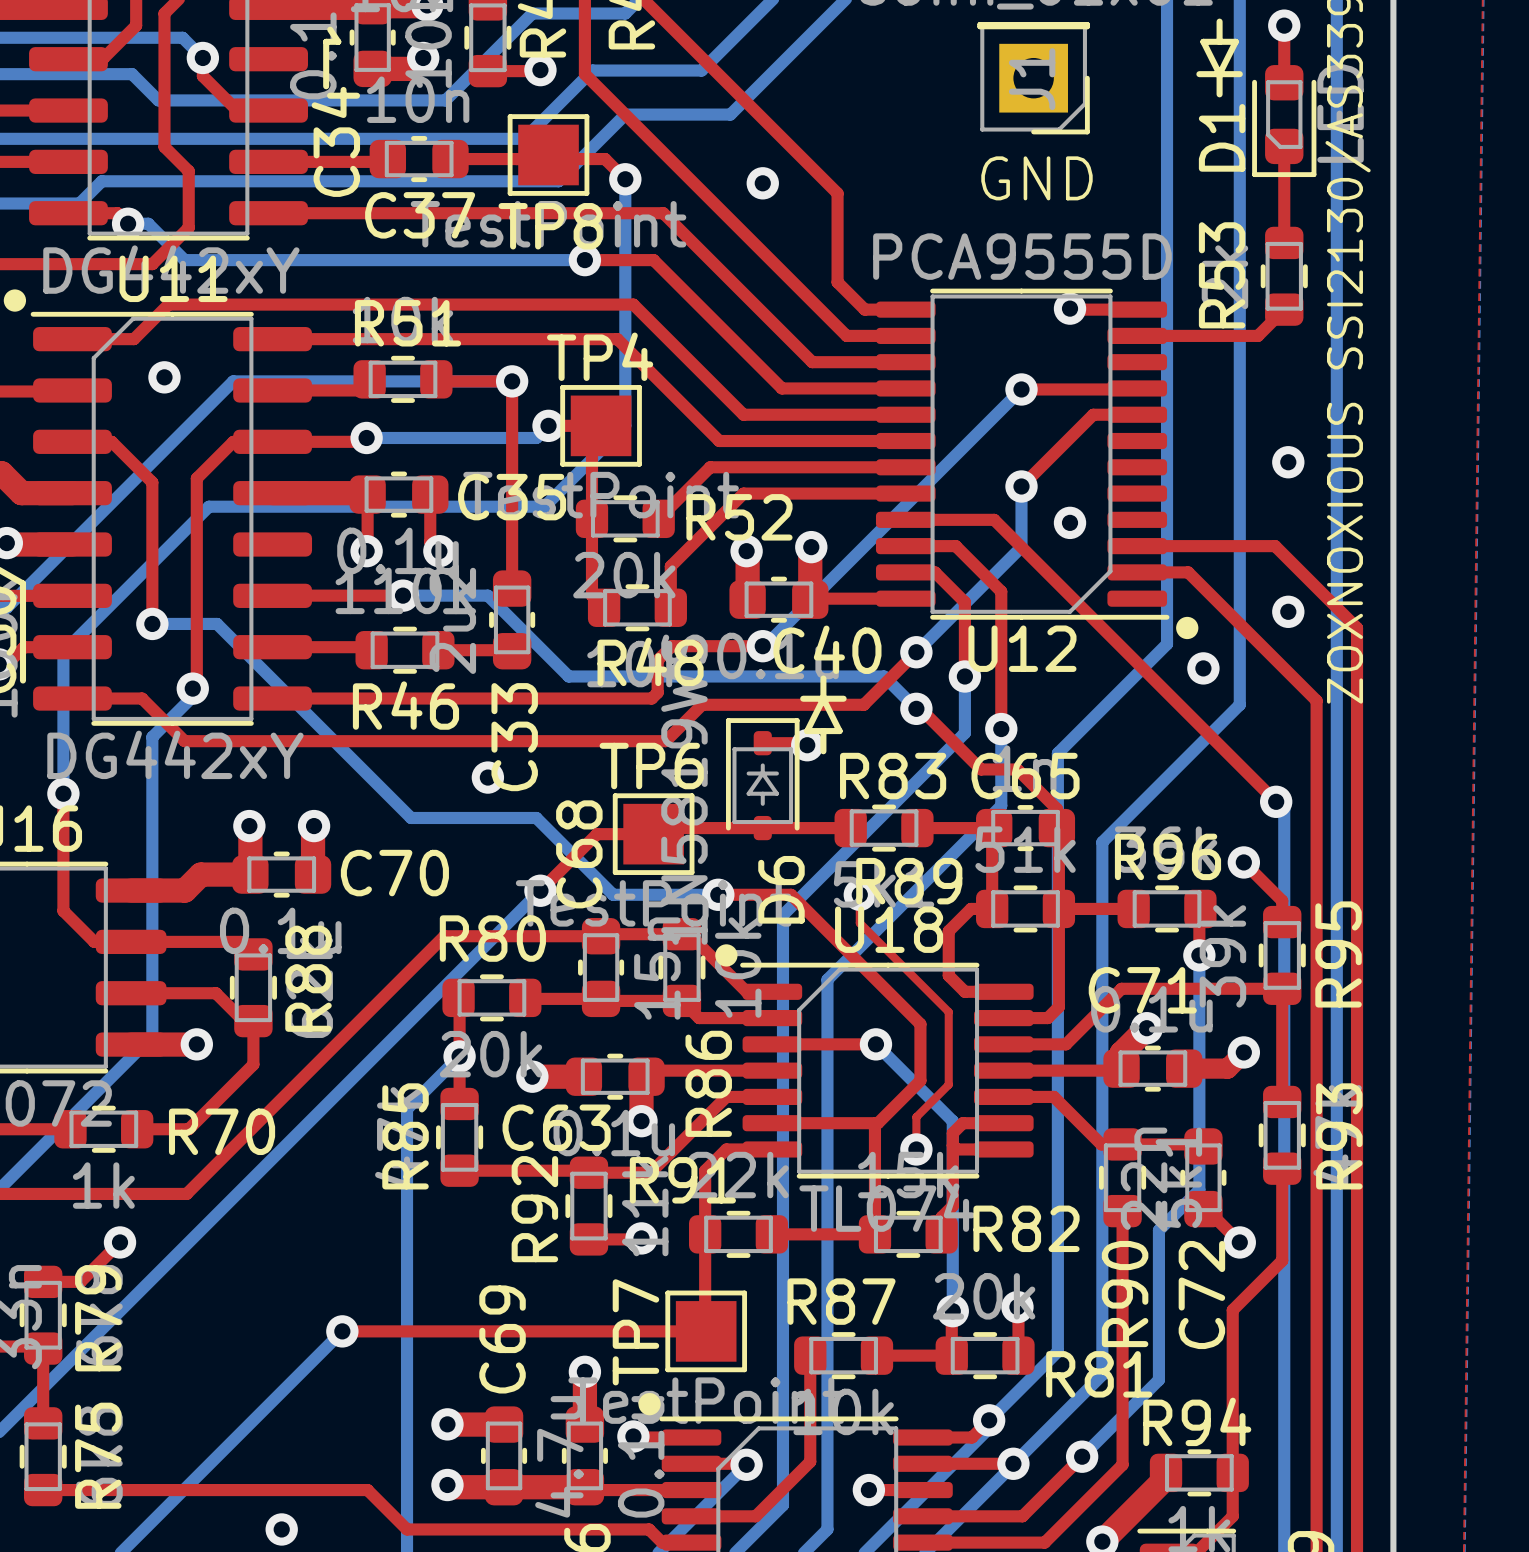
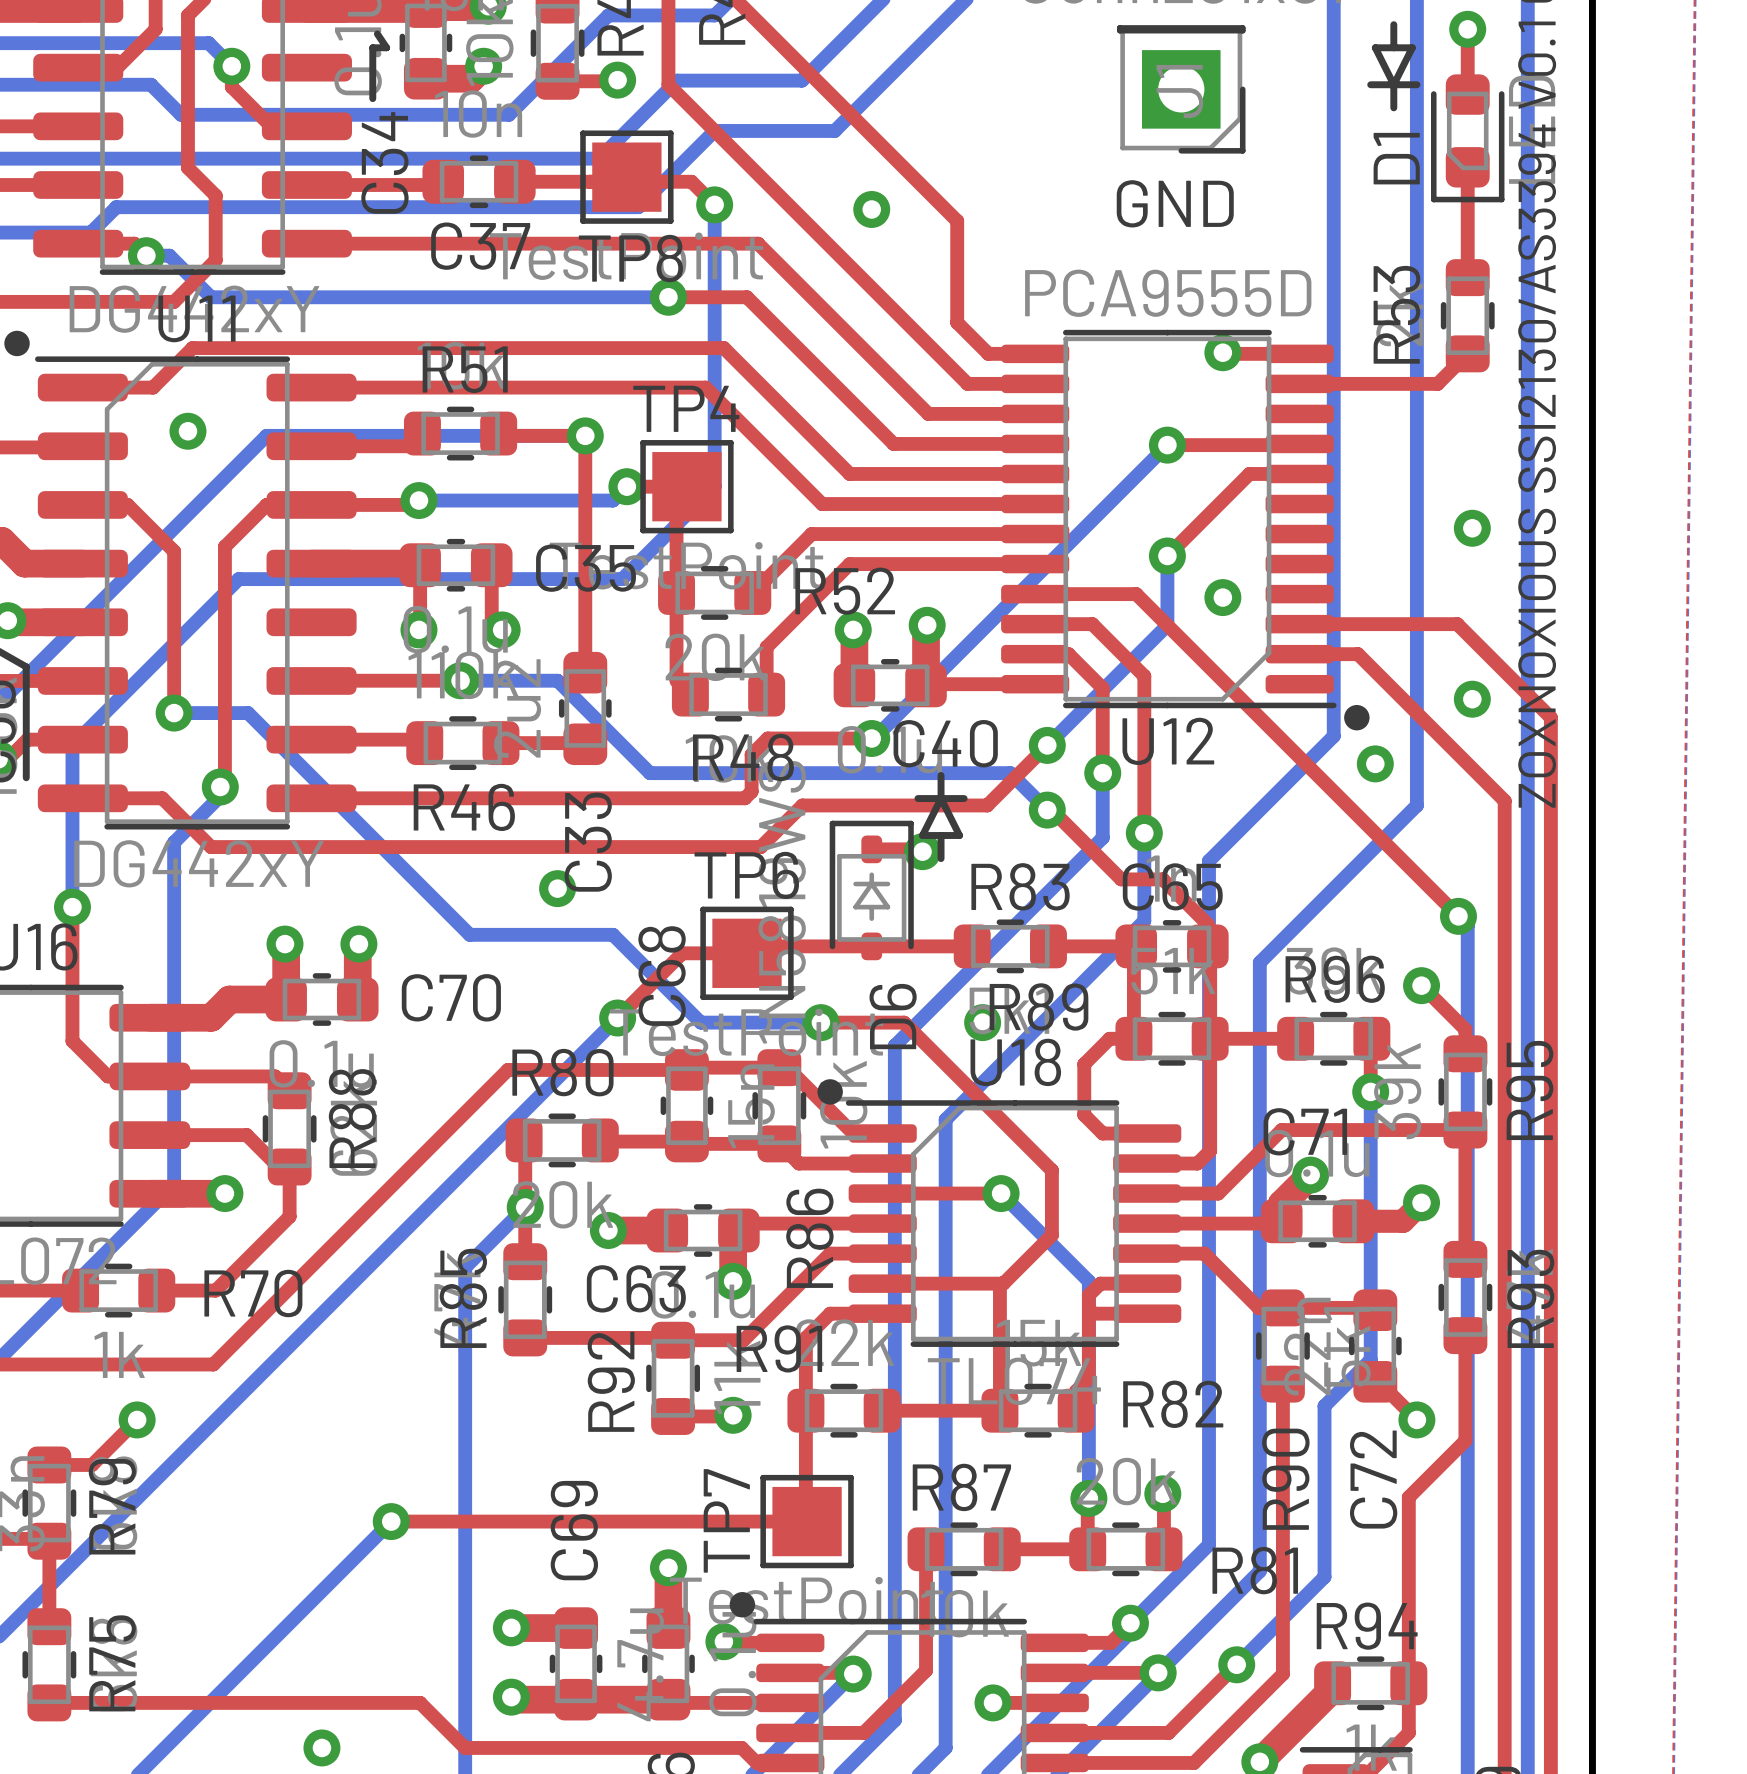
top track: (859, 894) (859, 923) (948, 1012) (948, 1084) (916, 1117) (916, 1149) -> none
via: (916, 1149) -> none

